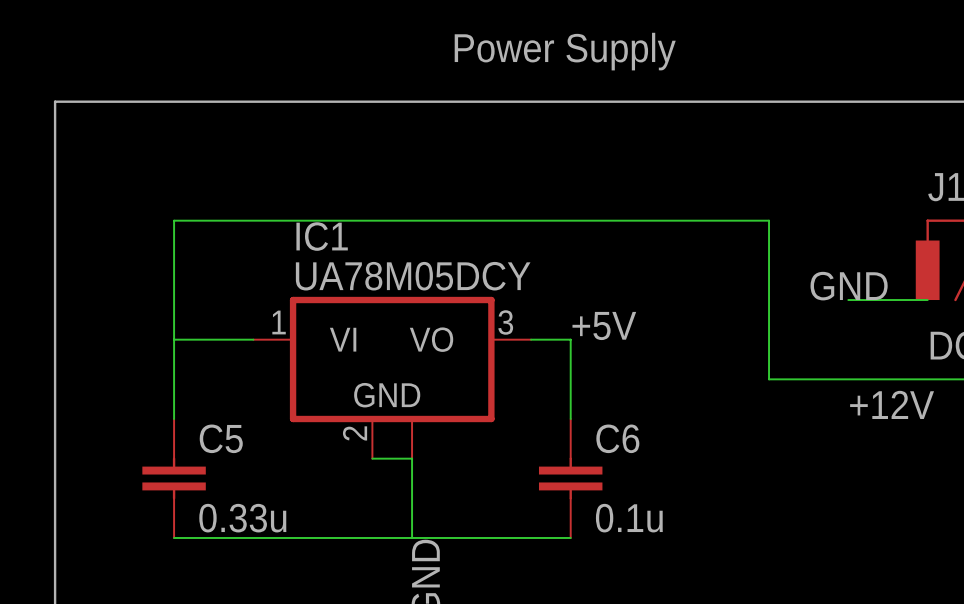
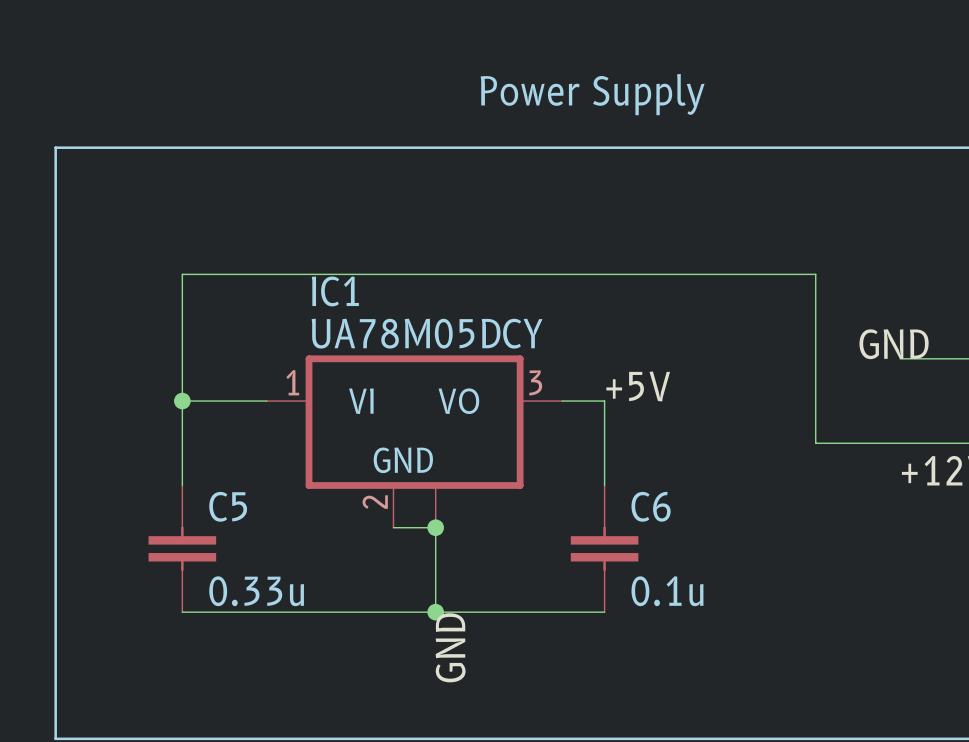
junction: none -> (182, 401)
junction: none -> (435, 527)
junction: none -> (435, 612)

